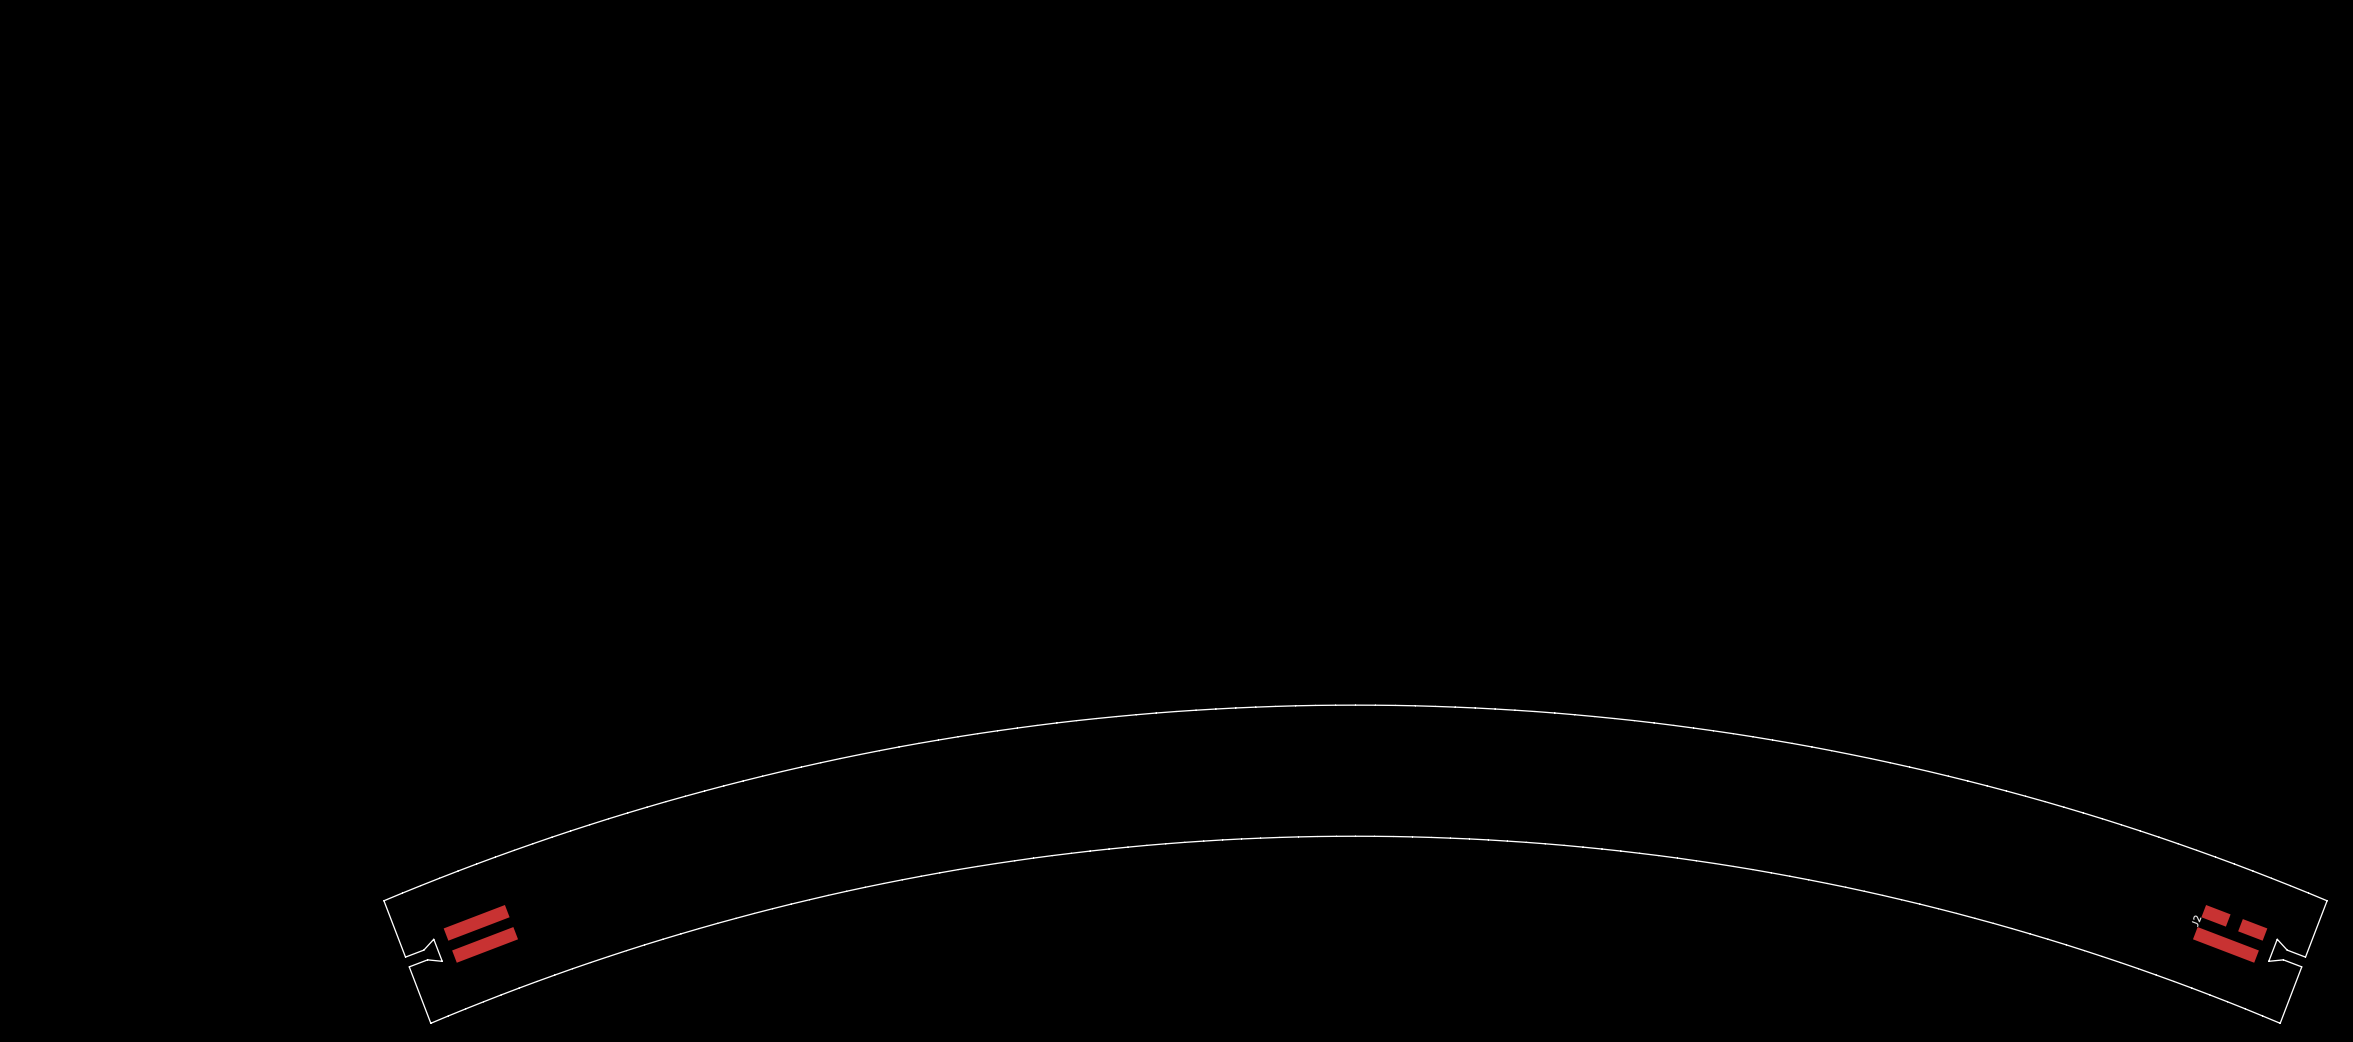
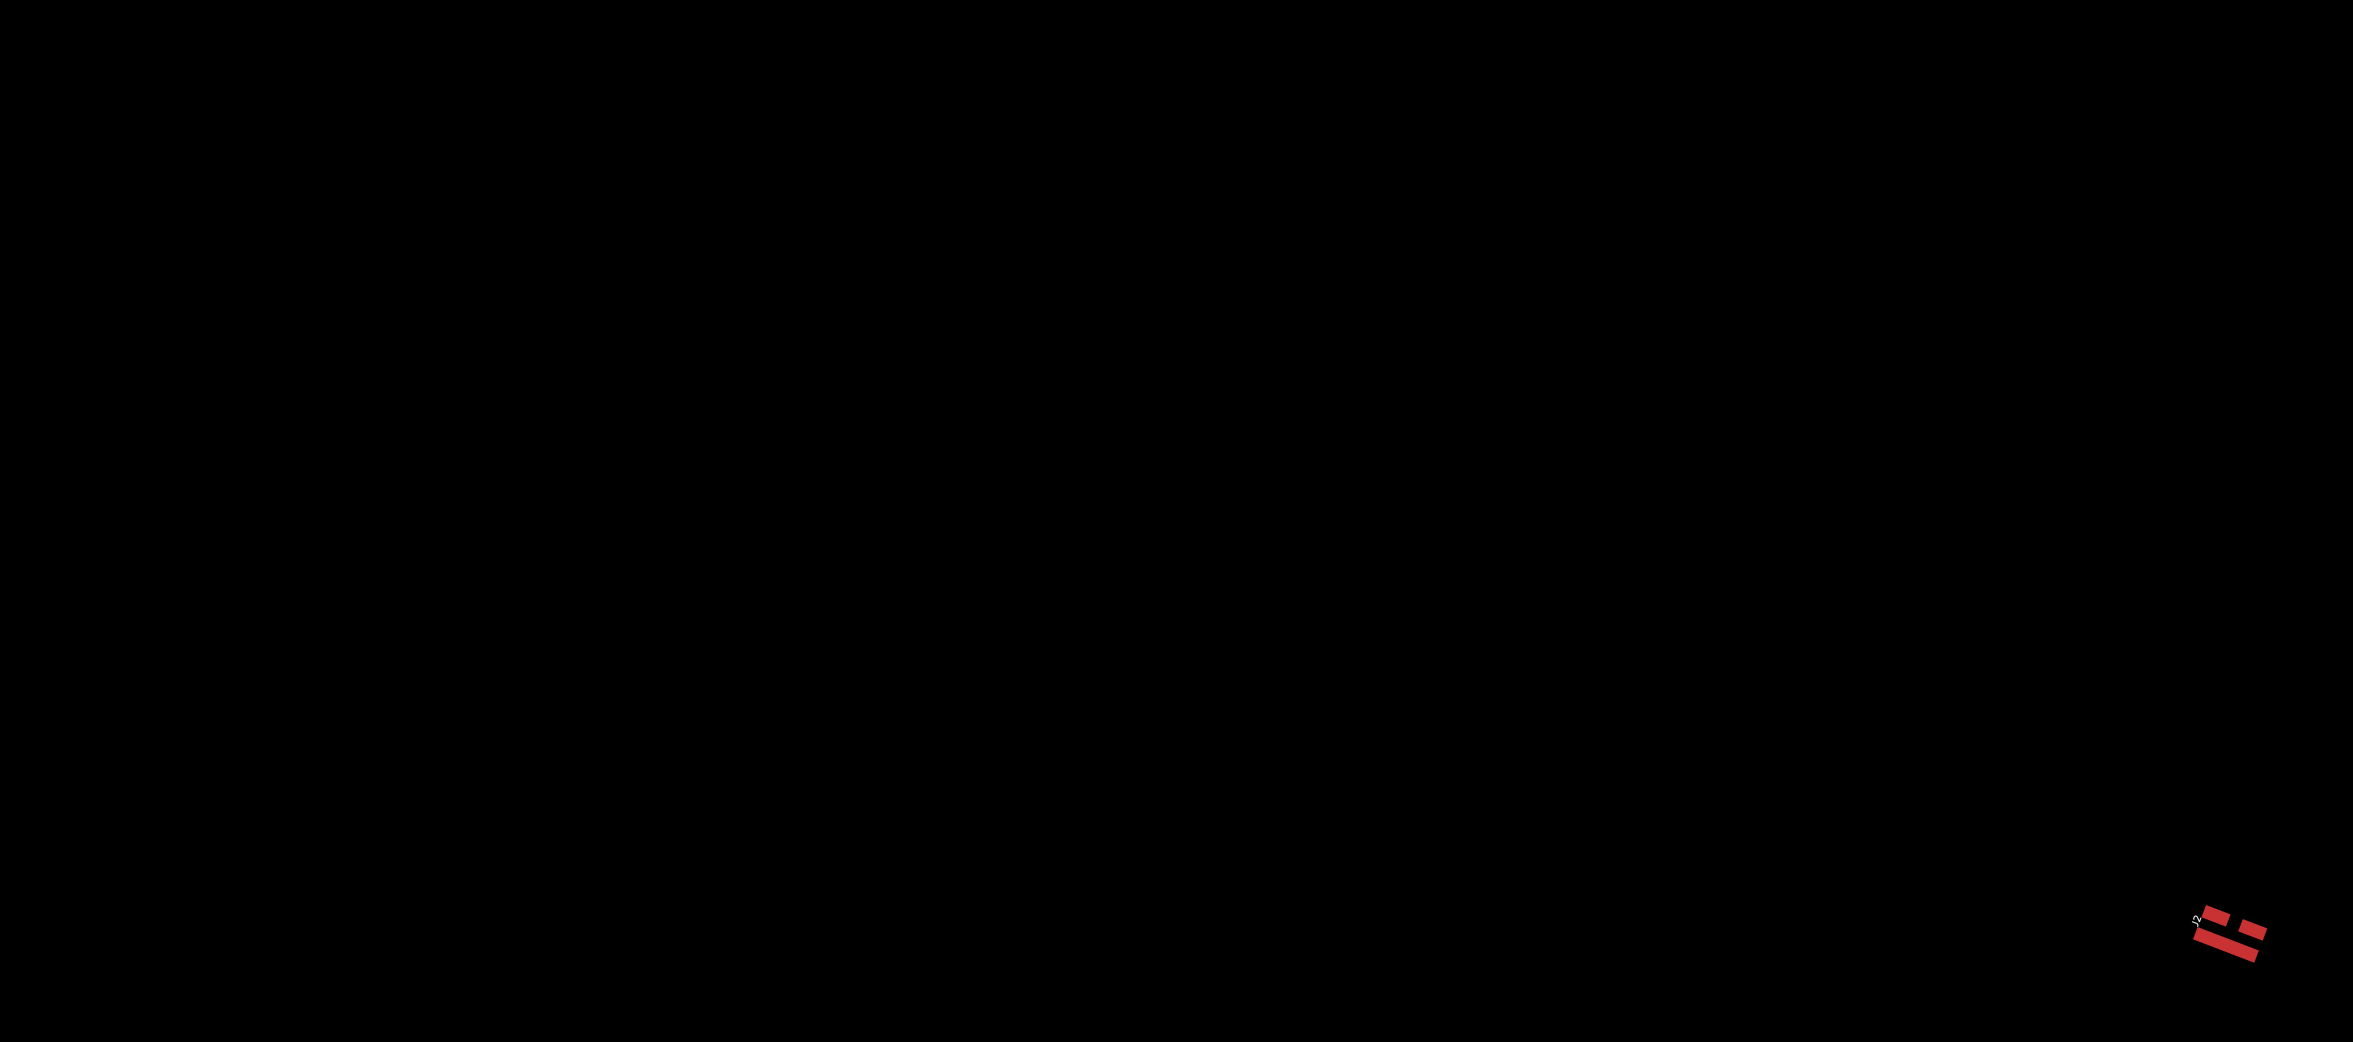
board edge: (1355, 705) (1475, 707) (1614, 718) (1733, 733) (1851, 754) (1987, 785) (2102, 818) (2215, 857) (2327, 900) (2305, 957) (2287, 950) (2277, 939) (2268, 961) (2283, 959) (2301, 966) (2280, 1023) (2174, 981) (2084, 950) (1993, 923) (1901, 899) (1808, 879) (1715, 863) (1620, 851) (1507, 841) (1374, 836) (1241, 838) (1090, 851) (958, 869) (828, 895) (699, 928) (572, 968) (430, 1023) (409, 966) (427, 959) (442, 961) (433, 939) (423, 950) (405, 957) (383, 900) (495, 857) (608, 818) (723, 785) (859, 754) (977, 733) (1096, 718) (1235, 707) (1355, 705) -> none
part: (480, 933) -> none

